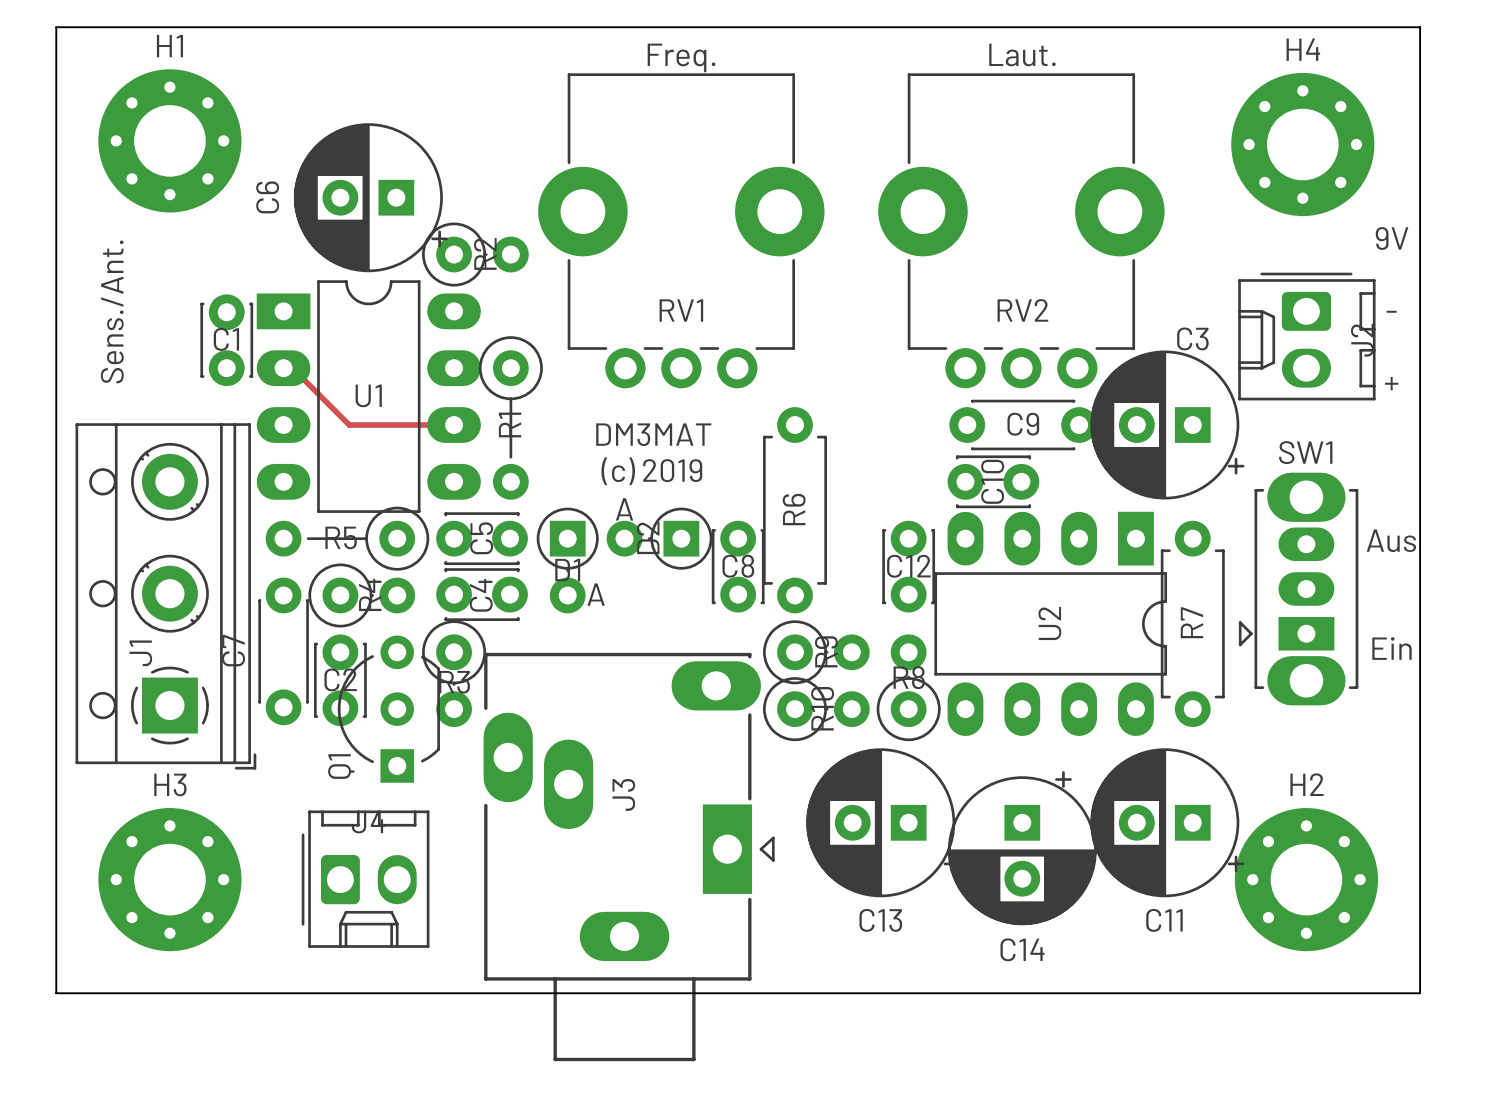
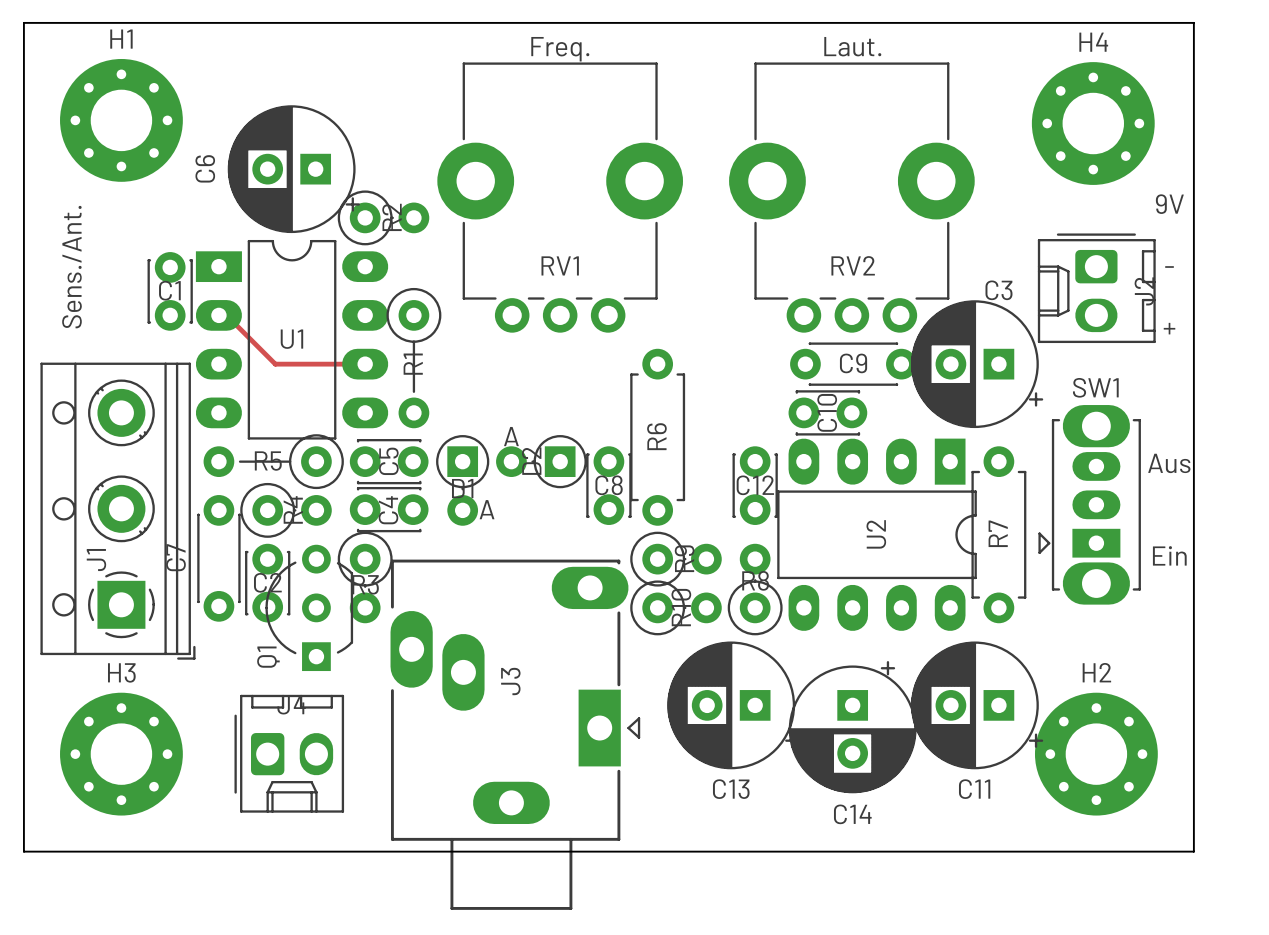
text: DM3MAT (653, 434) -> none
text: (c) 2019 (651, 471) -> none

